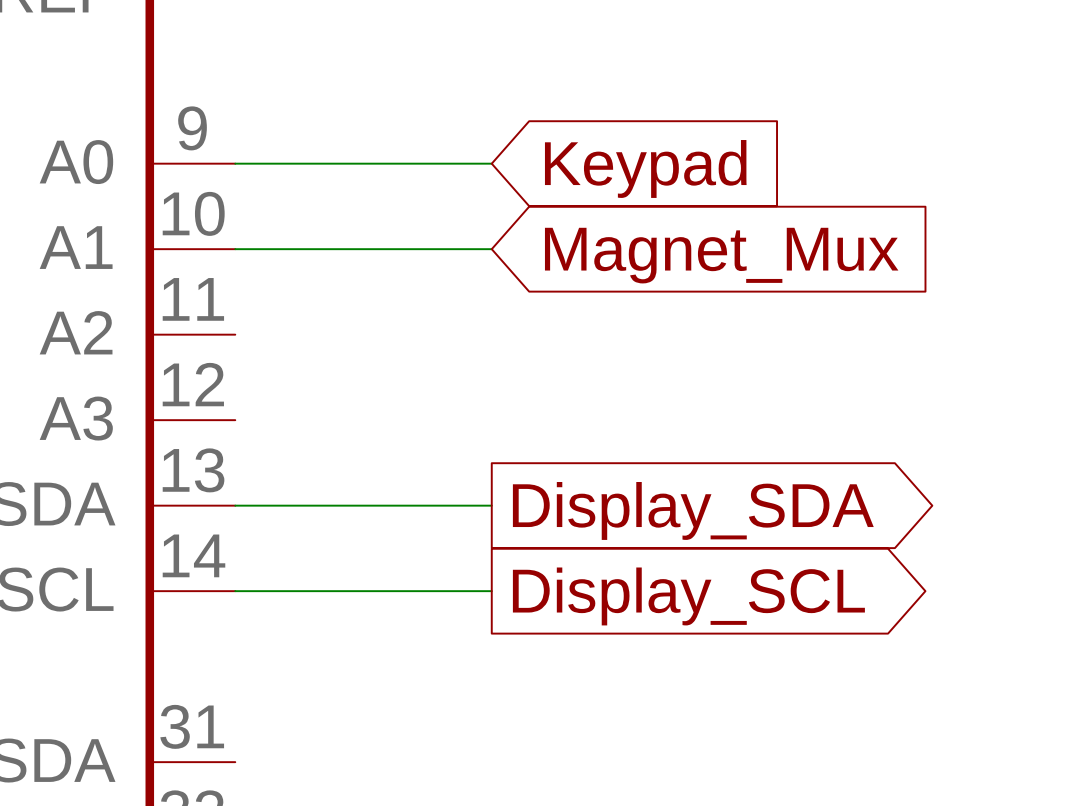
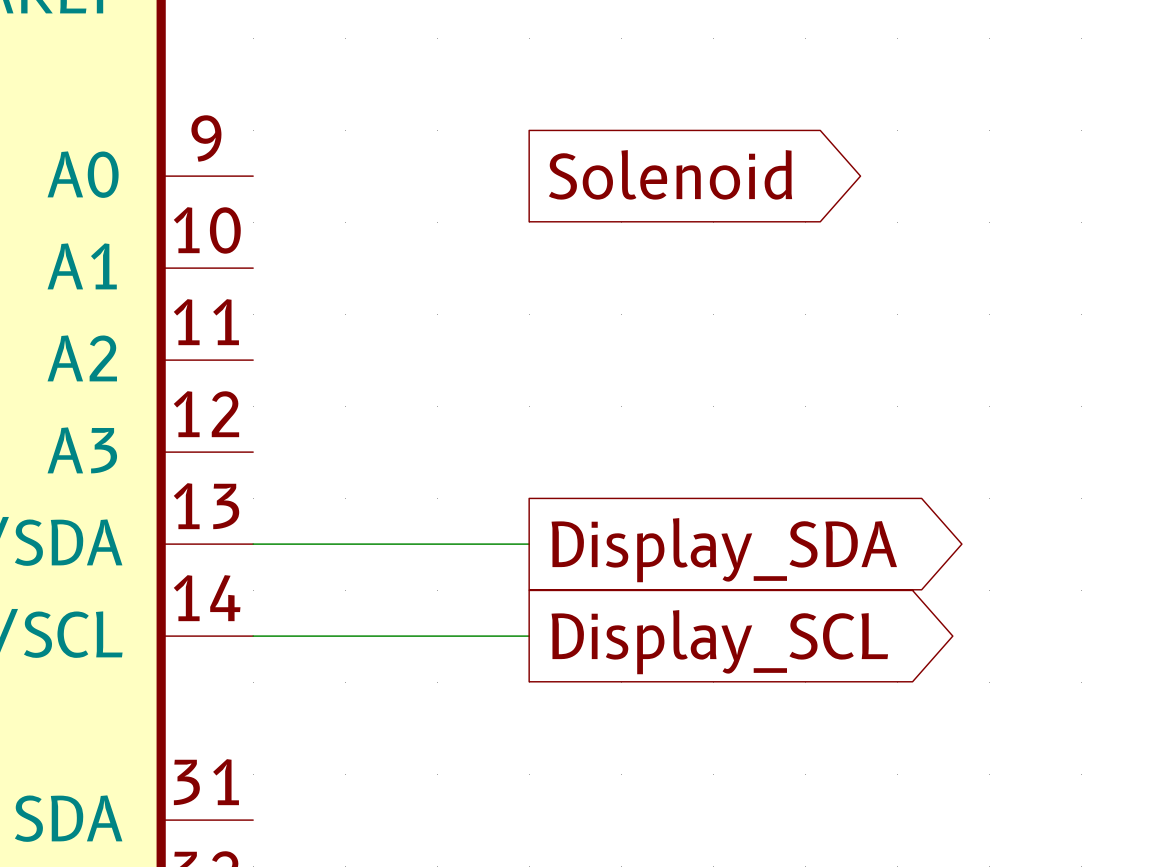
wire: (235, 163) (491, 163) -> none
global label shape: input (645, 168) -> output (670, 174)
global label: Keypad (645, 168) -> Solenoid (670, 174)
wire: (235, 249) (491, 249) -> none
global label: Magnet_Mux (721, 255) -> none

